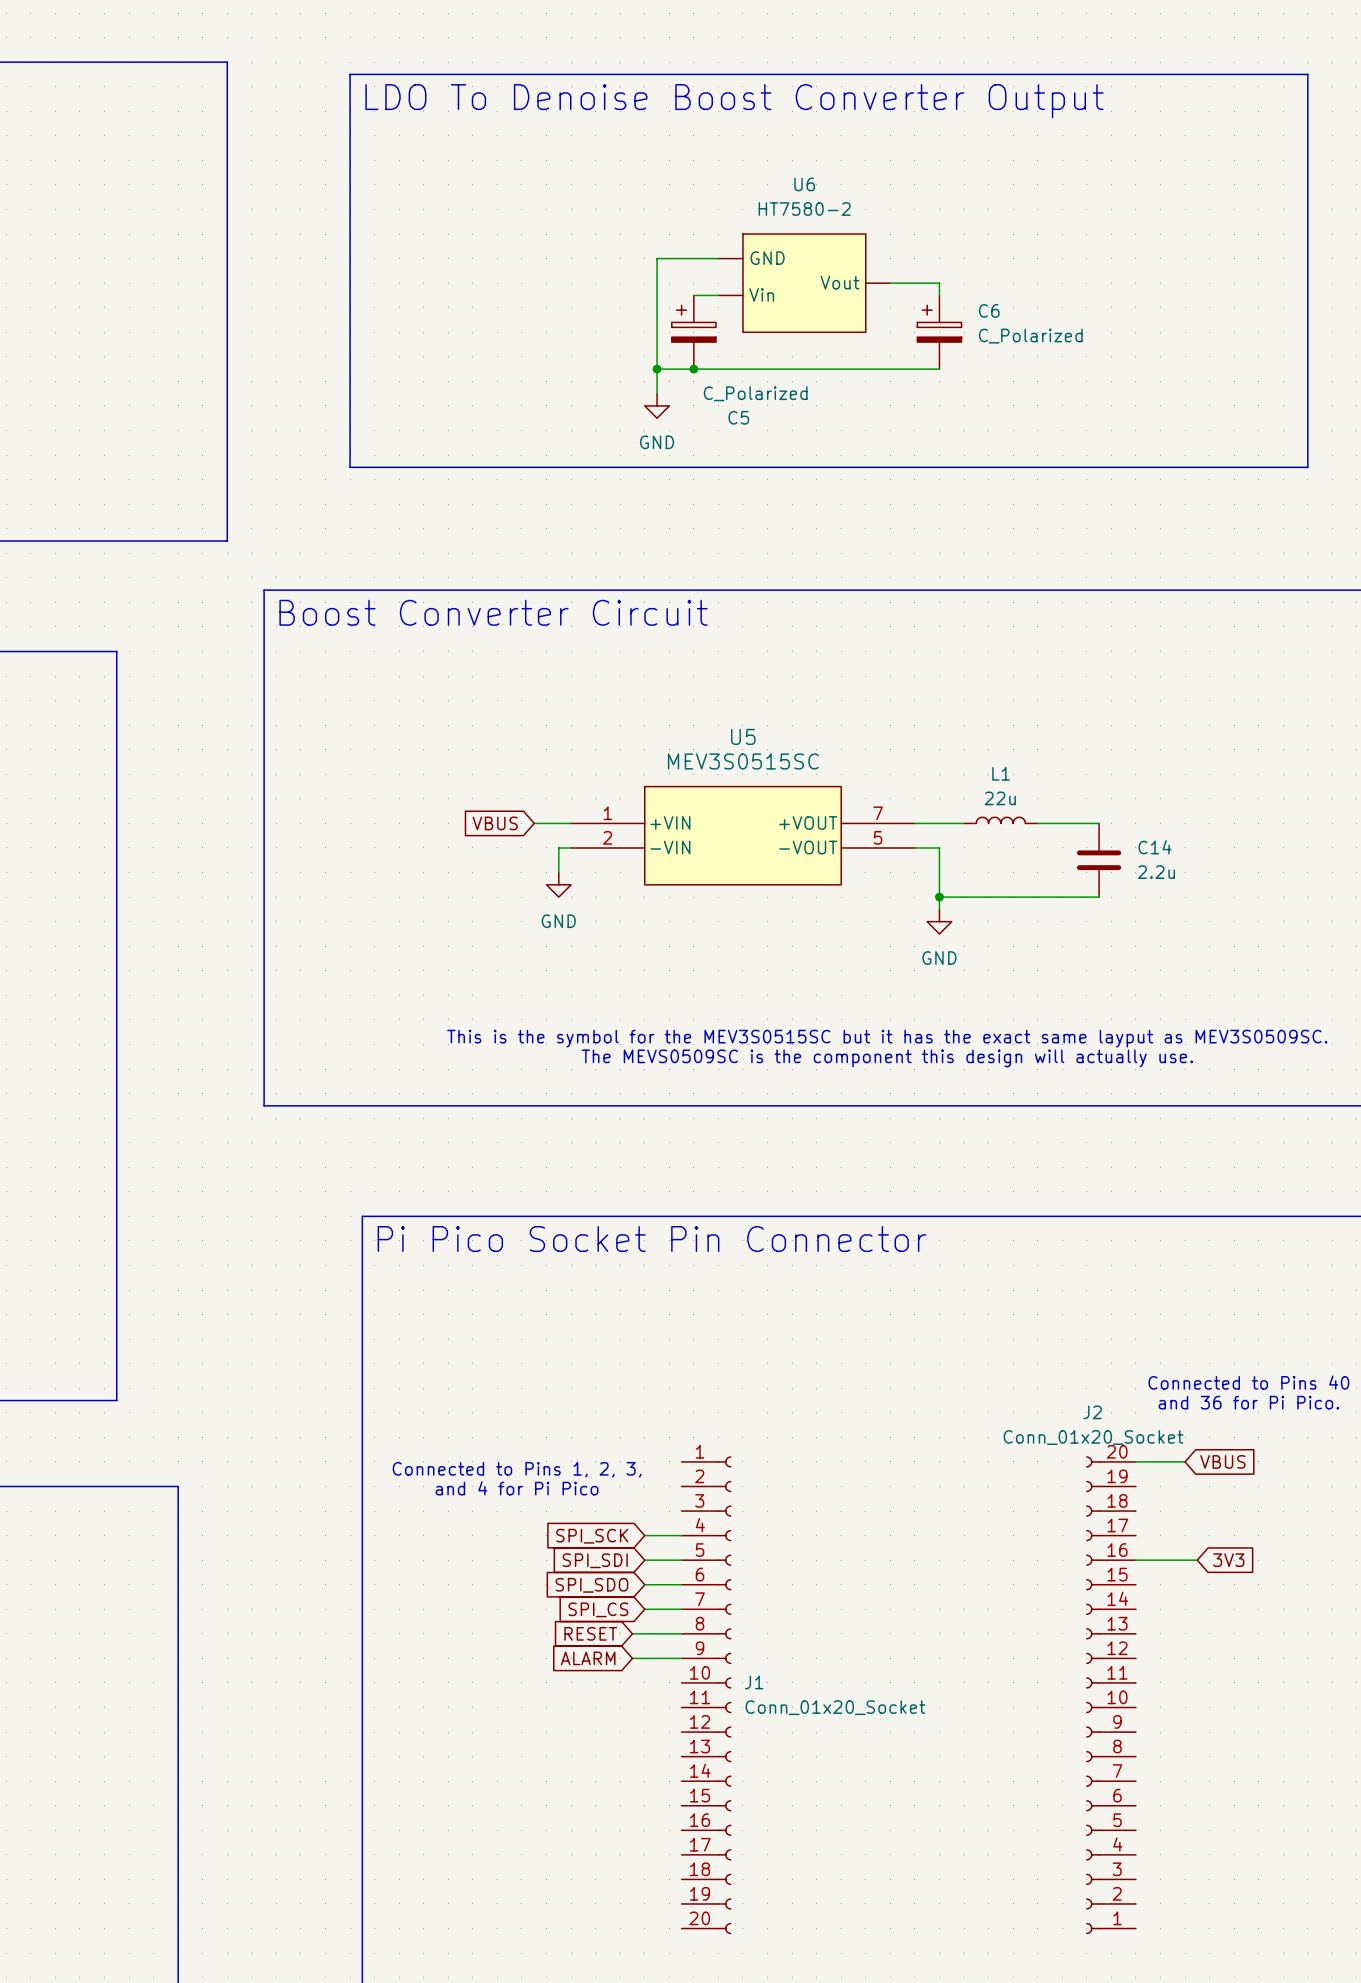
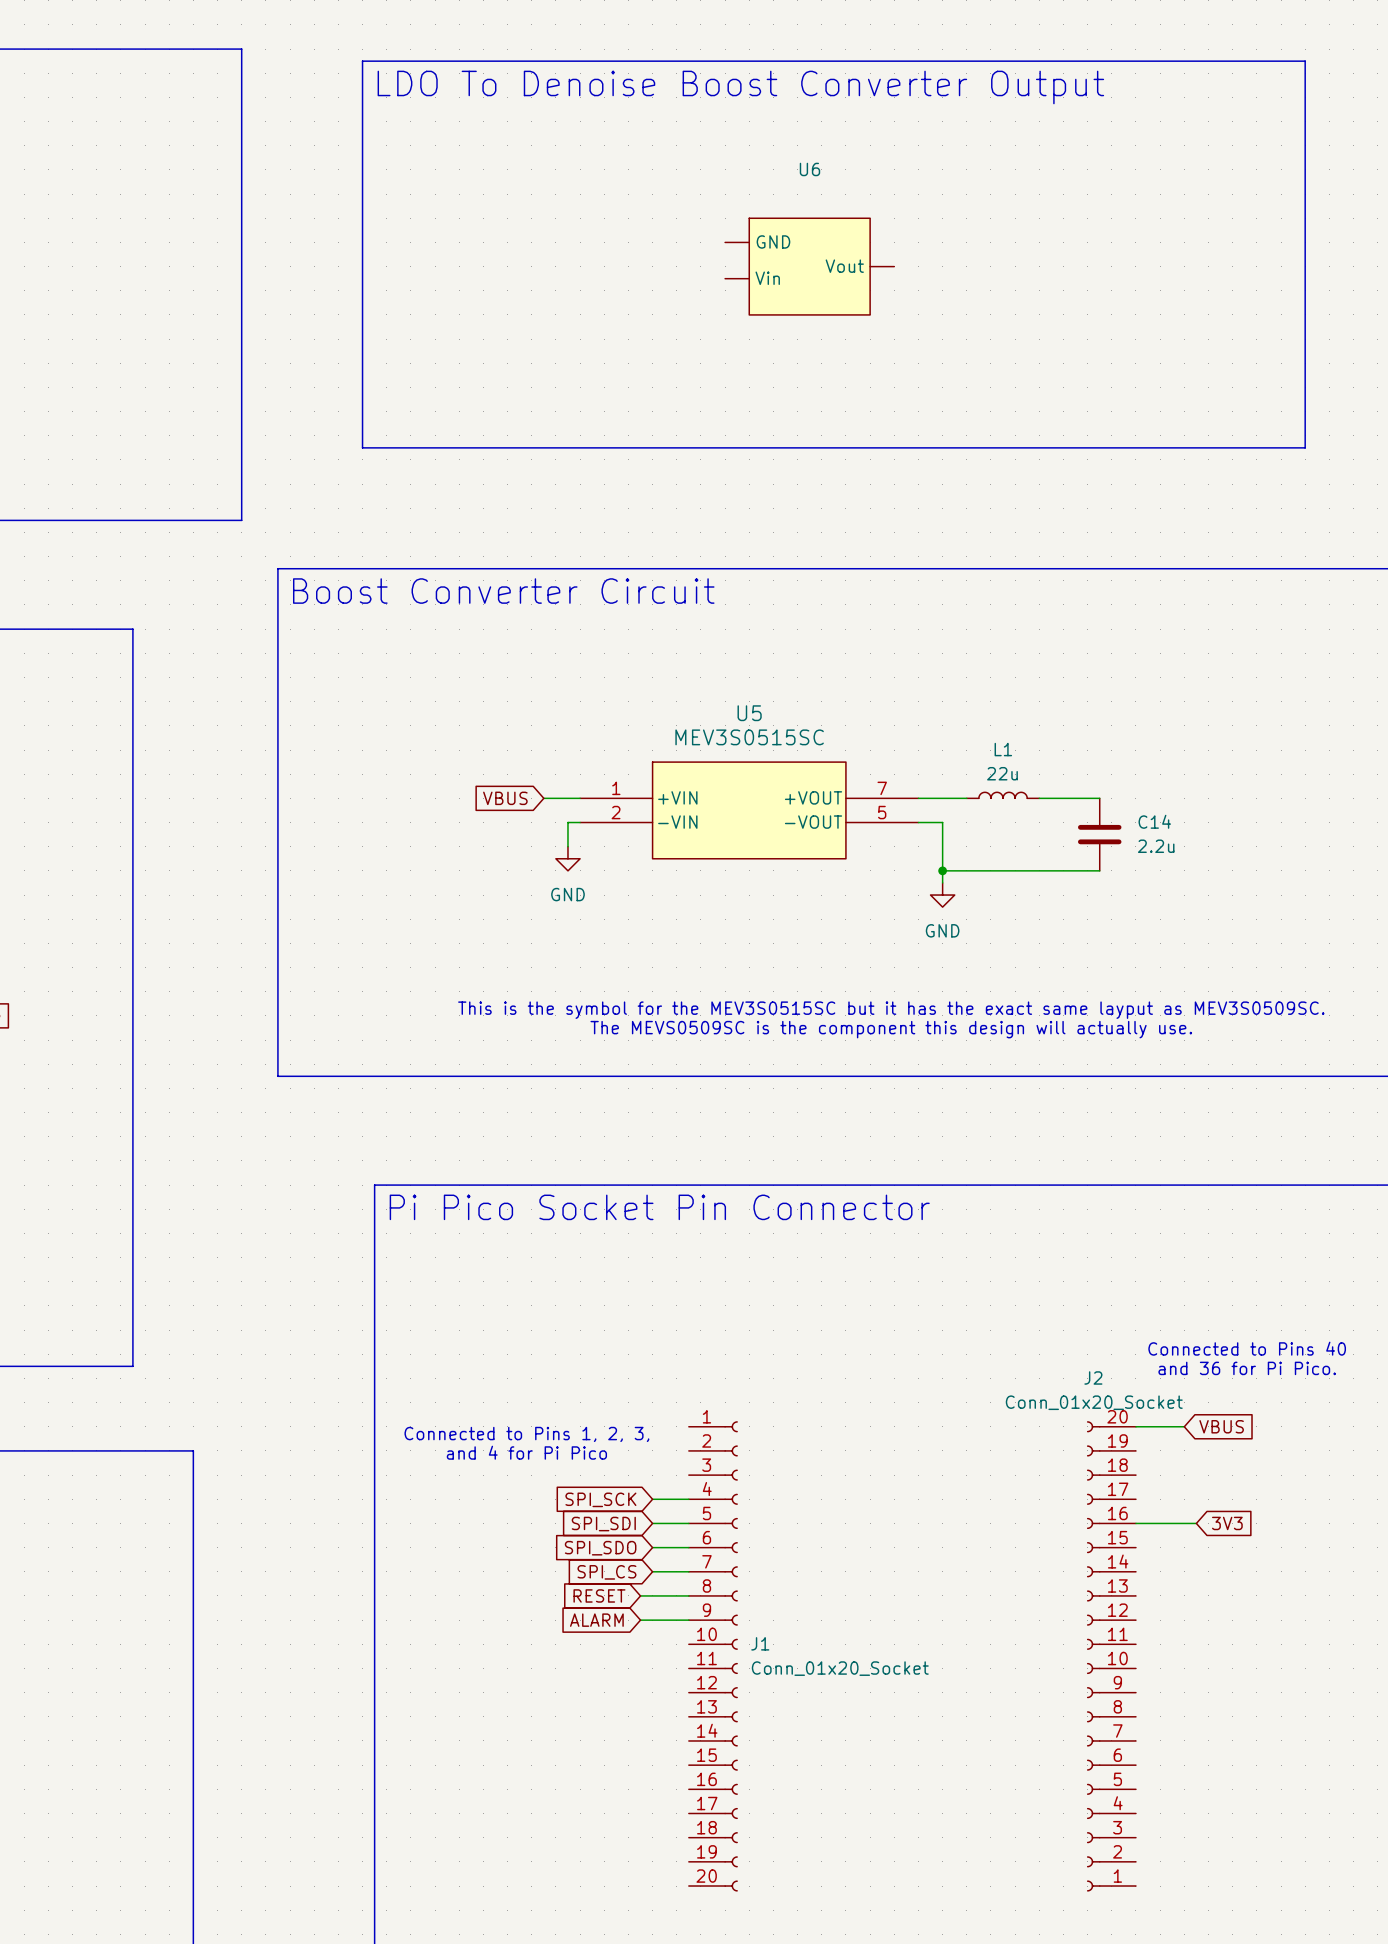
U6 value: HT7580-2 (804, 209) -> none
wire: (718, 258) (657, 258) (657, 393) -> none
wire: (890, 283) (939, 283) (939, 295) -> none
wire: (693, 295) (718, 295) -> none
C5: C_Polarized (693, 332) -> none
C6: C_Polarized (939, 332) -> none
wire: (657, 369) (939, 369) -> none
junction: (657, 369) -> none
junction: (693, 369) -> none
power symbol: GND (657, 405) -> none

